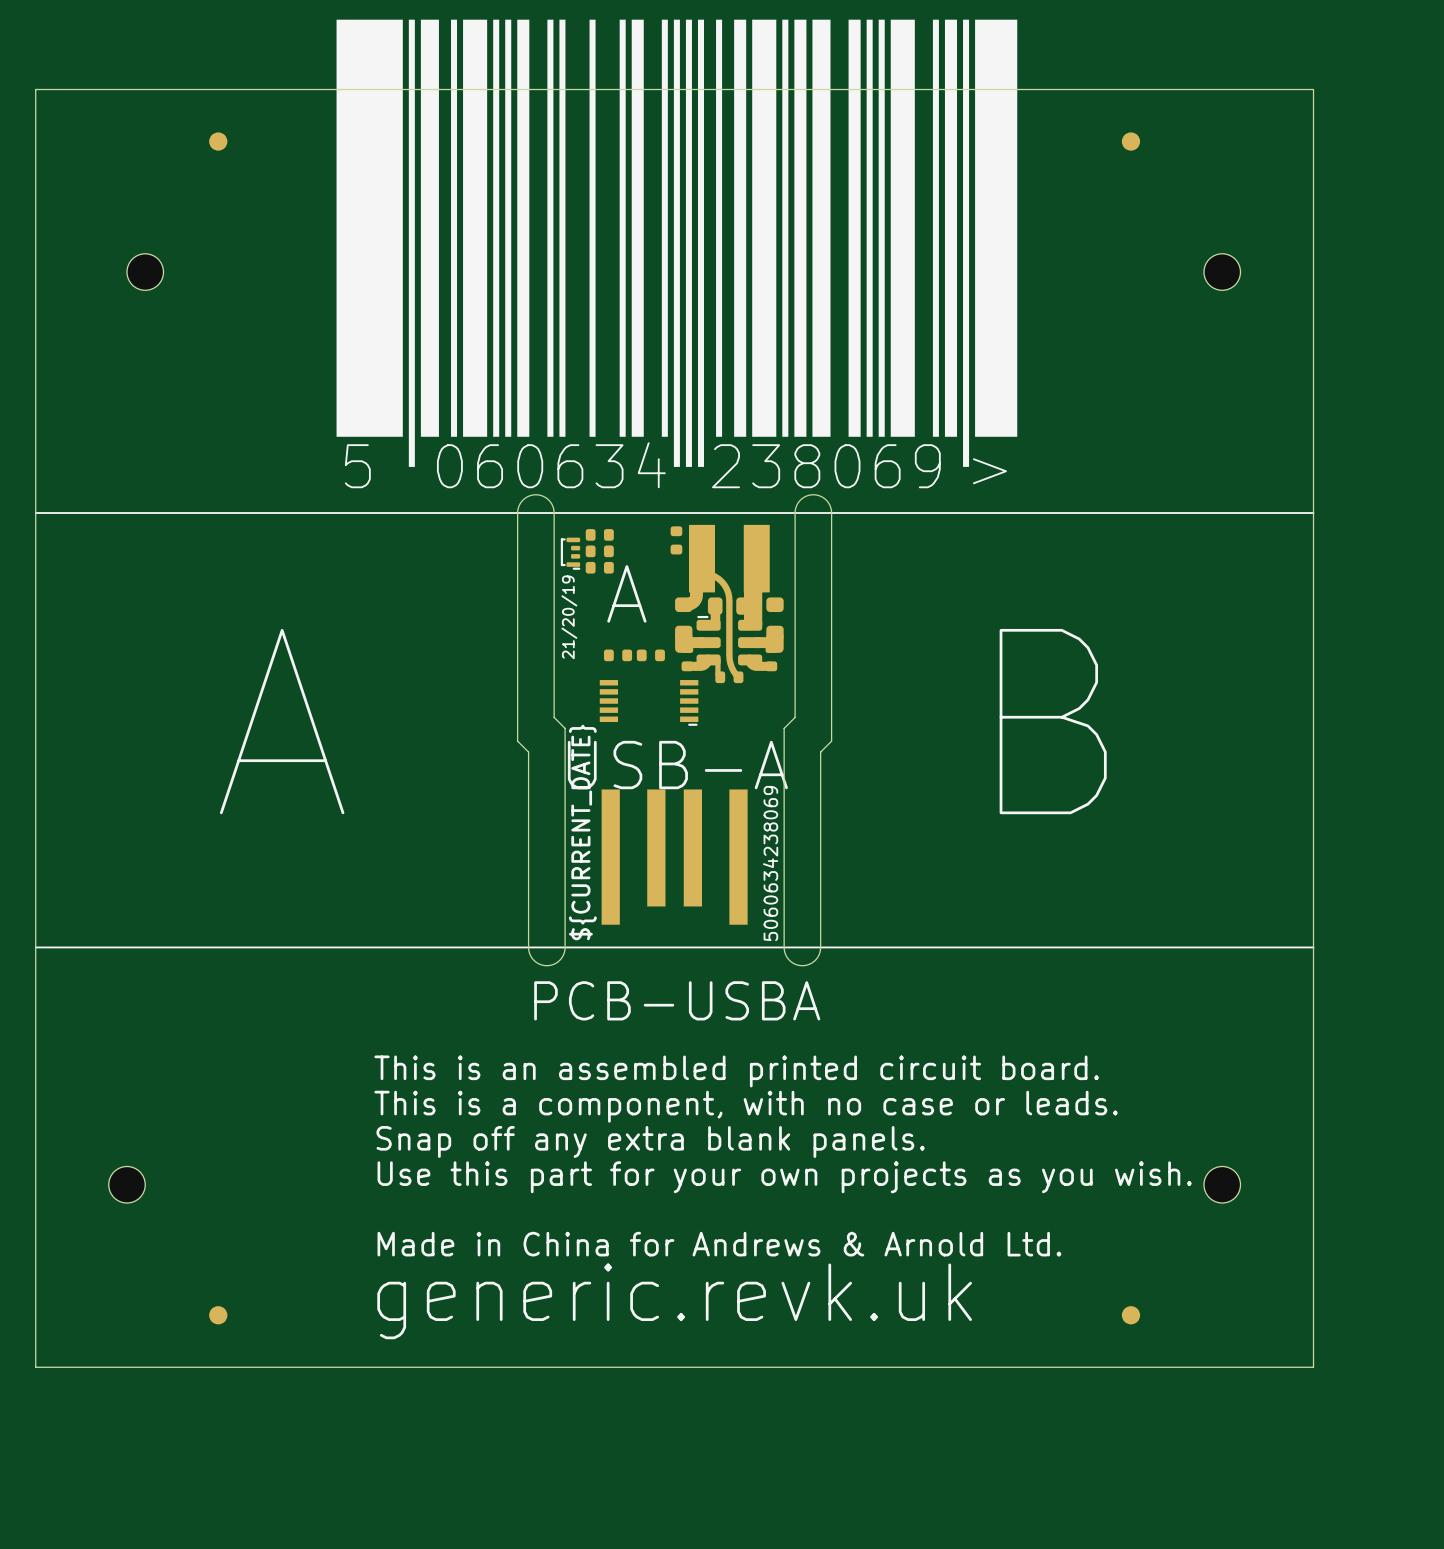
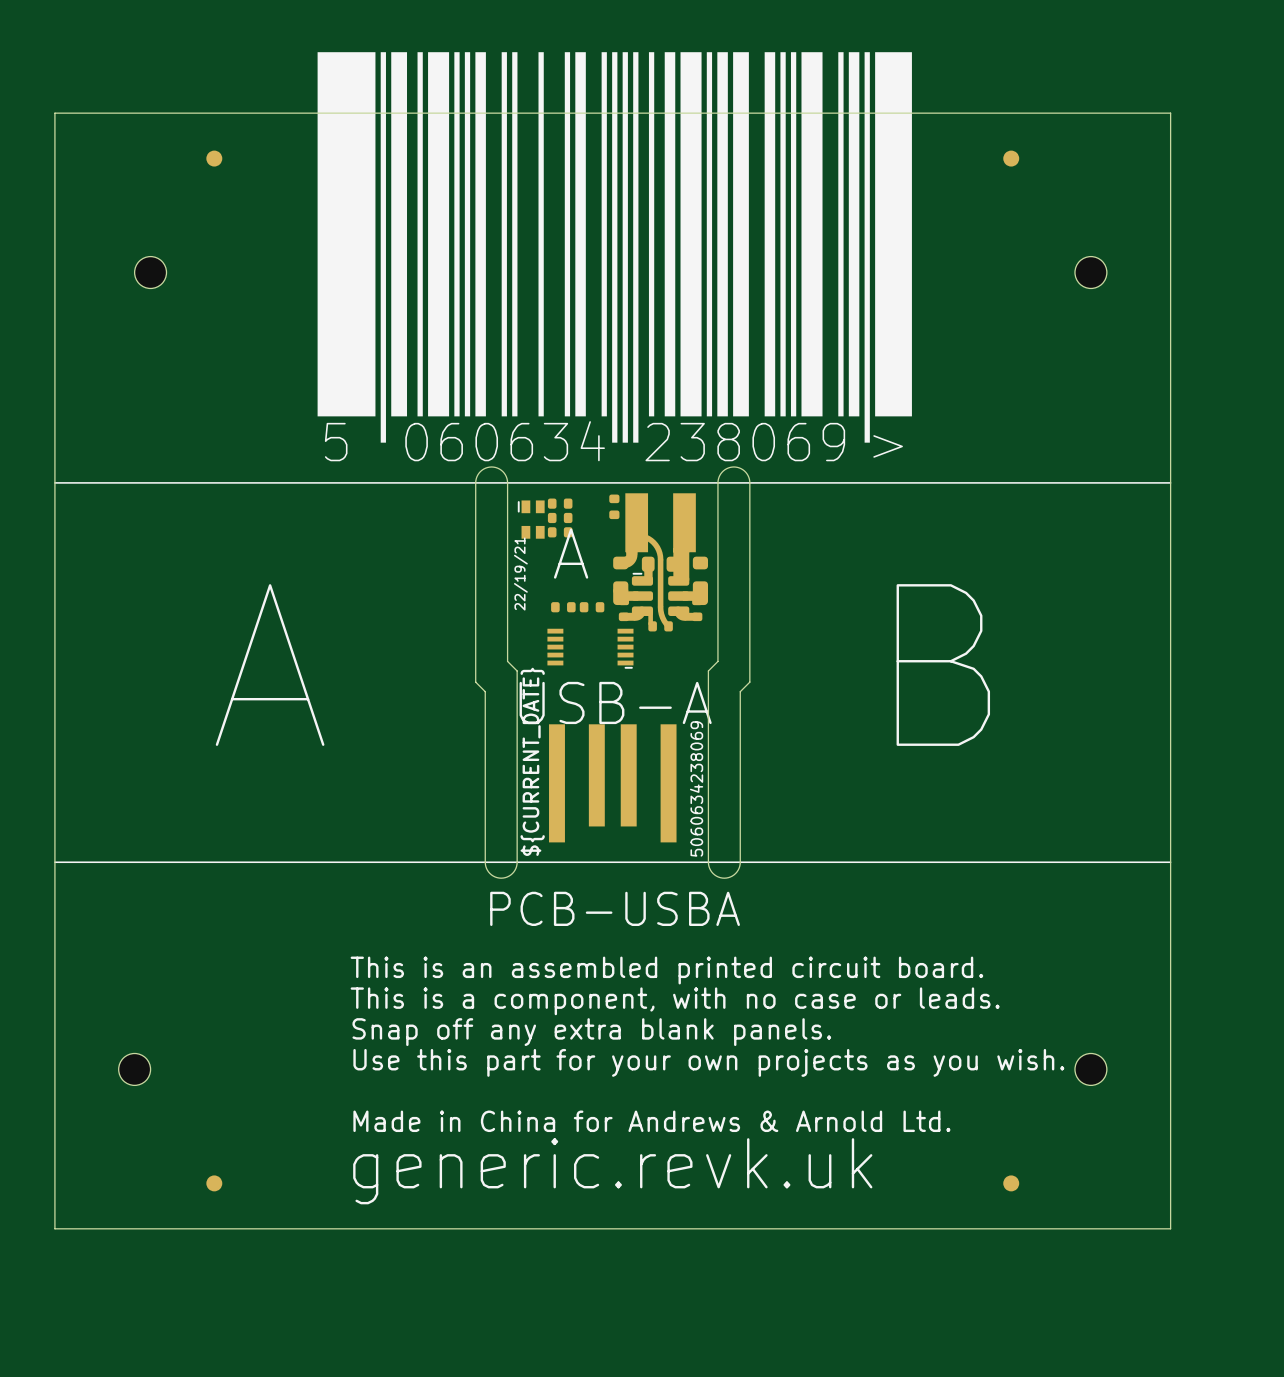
part: (599, 534) -> none
part: none -> (560, 503)
part: (599, 551) -> none
part: (570, 553) -> none
part: none -> (560, 517)
part: none -> (531, 519)
part: (599, 567) -> none
part: none -> (560, 532)
text: 21/20/19 (569, 617) -> 22/19/21 (520, 573)

